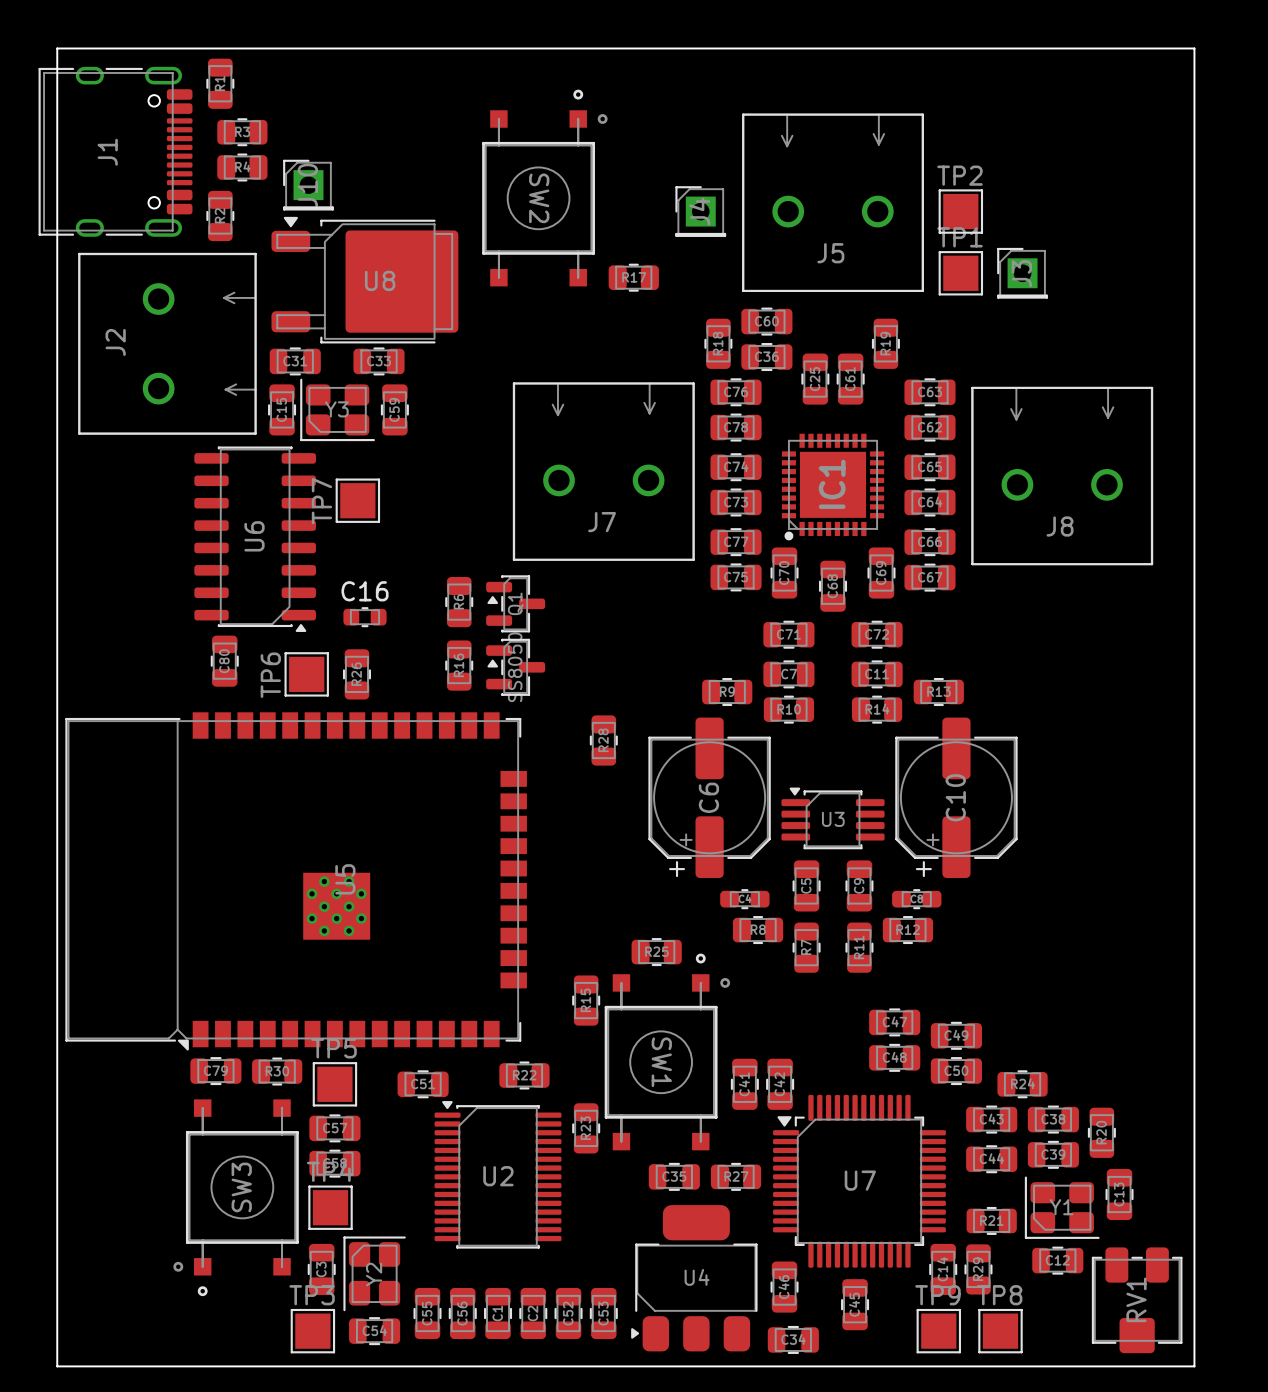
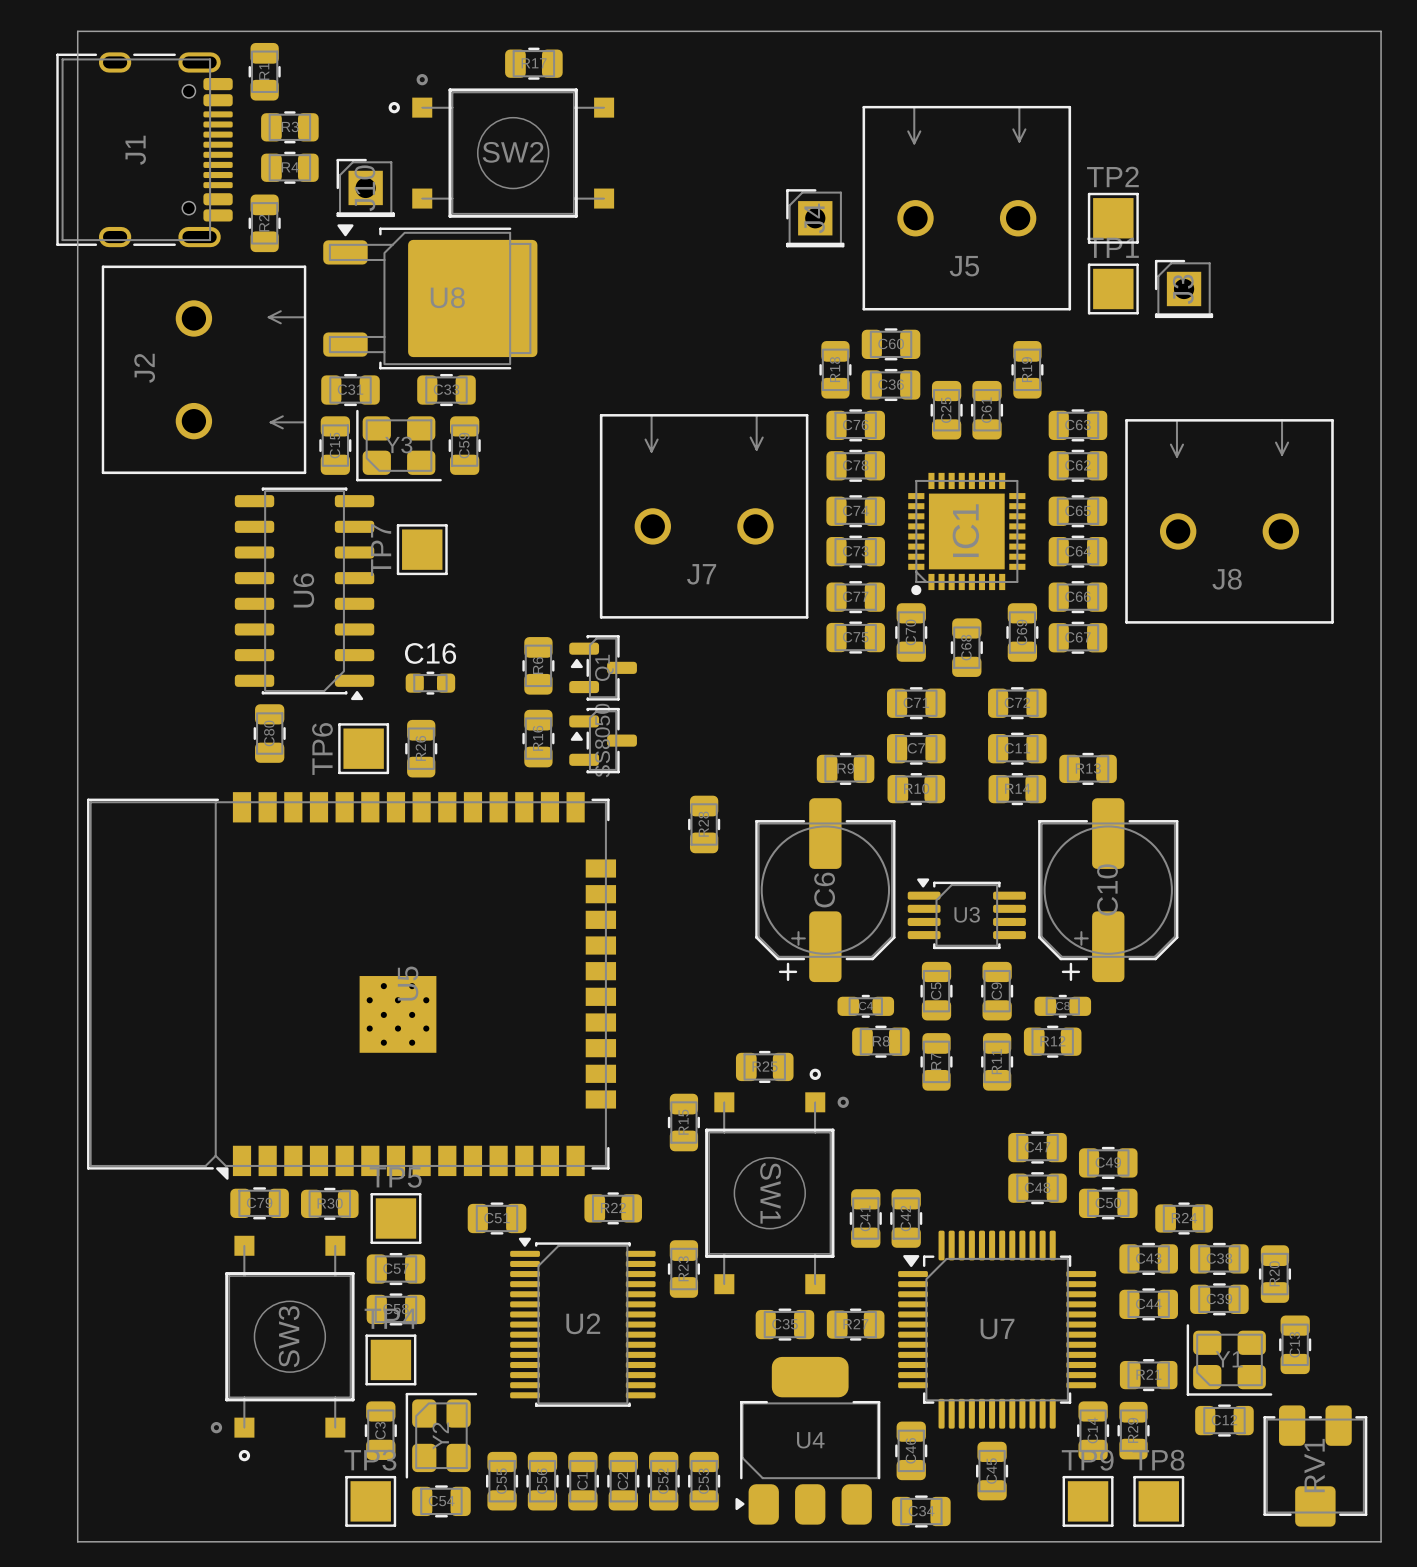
SW2 rotation: 0° (544, 188) -> 90° counterclockwise (501, 145)
SW2 position: (544, 188) -> (501, 145)
R17 position: (633, 277) -> (533, 63)

